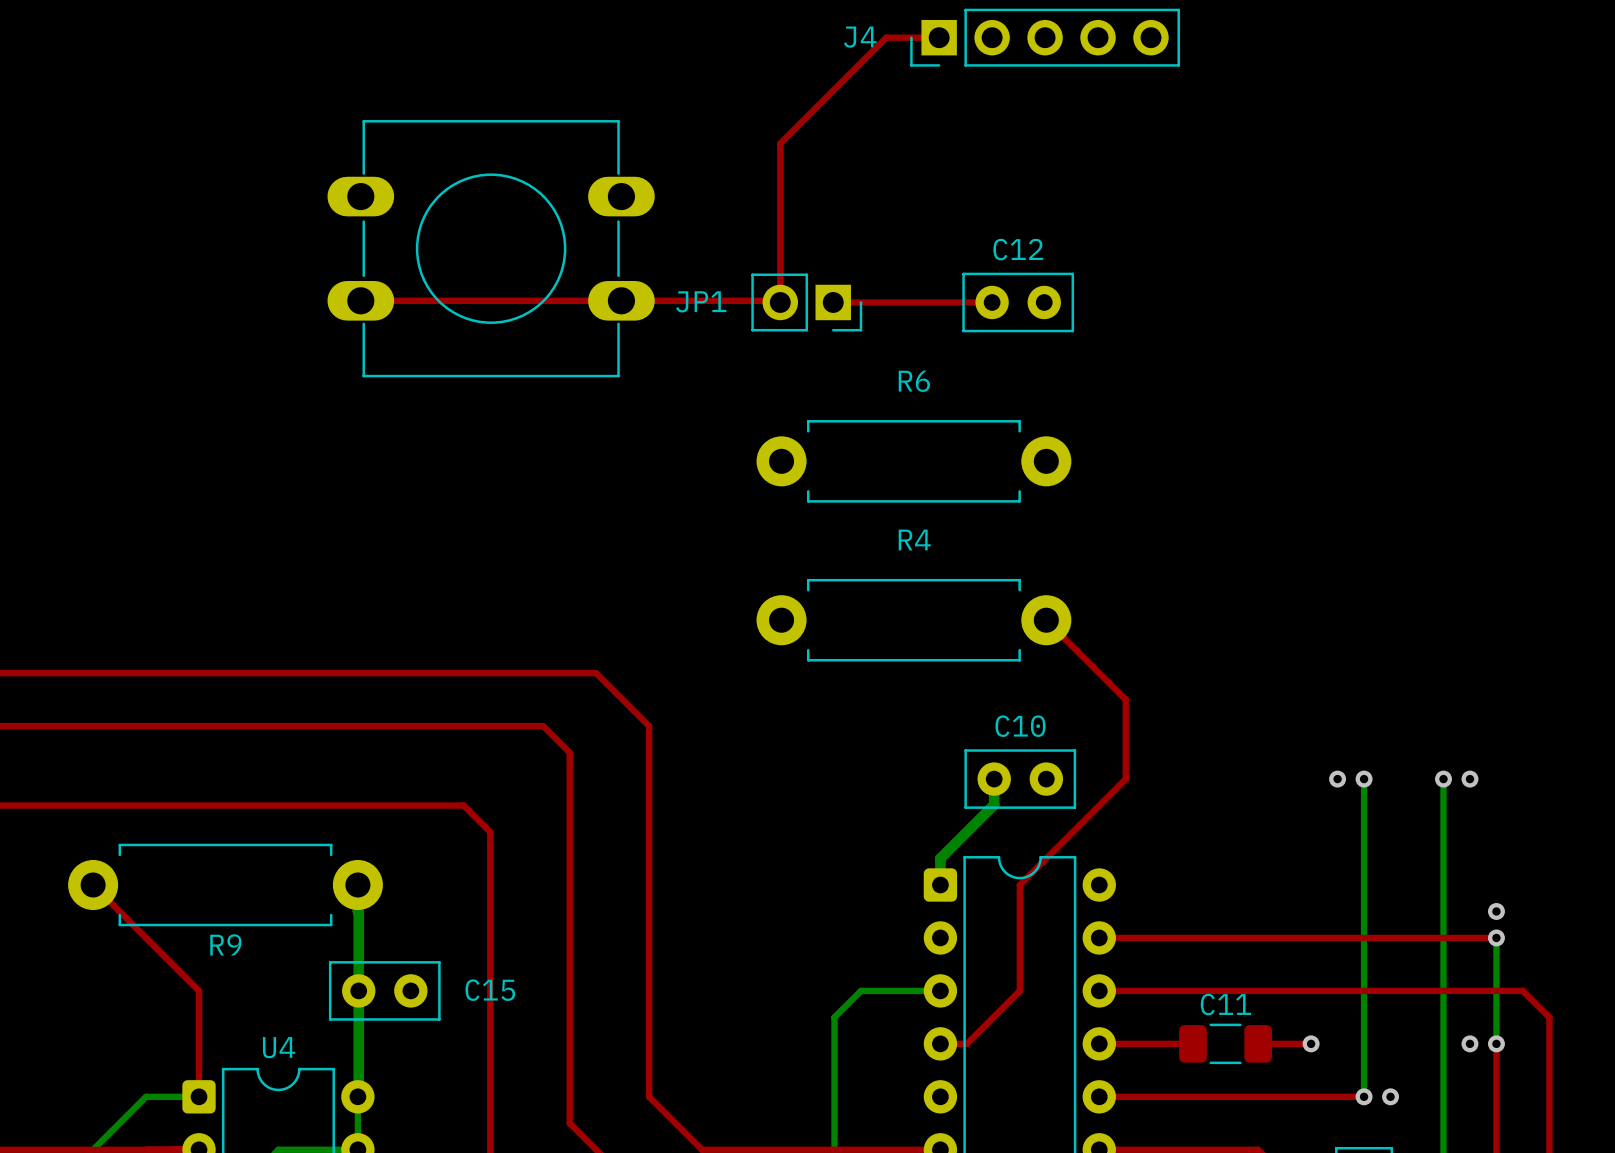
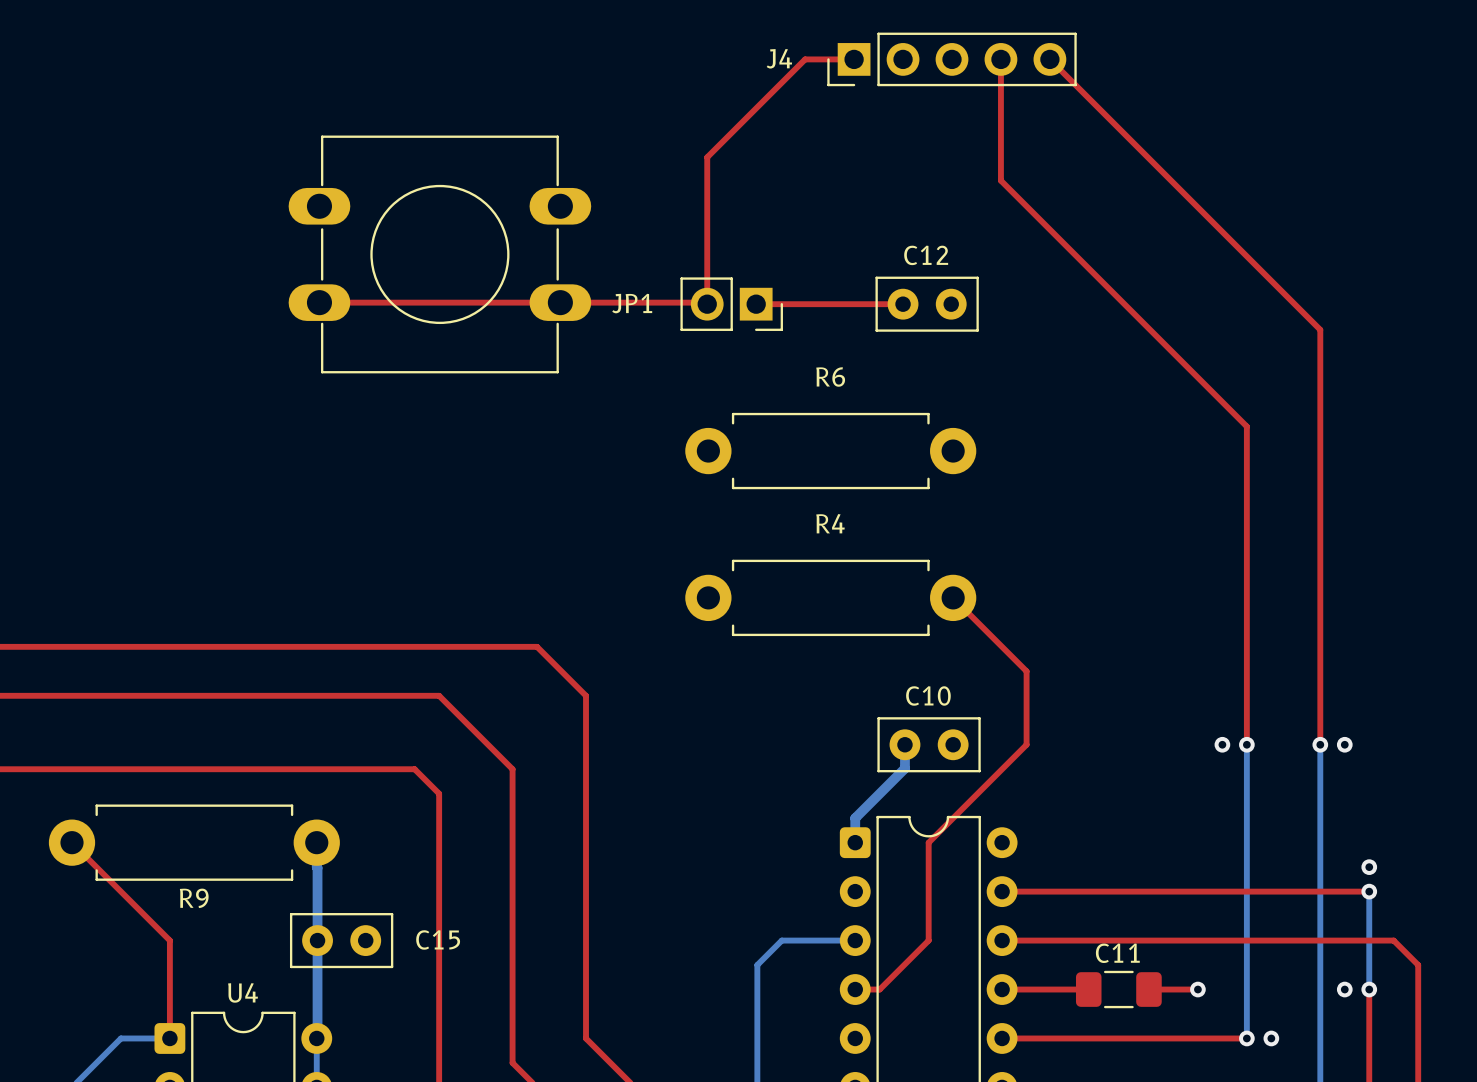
top track: none -> (1000, 59) (1000, 180) (1246, 426) (1246, 744)
top track: none -> (1049, 59) (1320, 329) (1320, 744)
top track: (490, 726) (543, 726) (569, 752) (569, 805) -> (439, 695) (512, 769)

